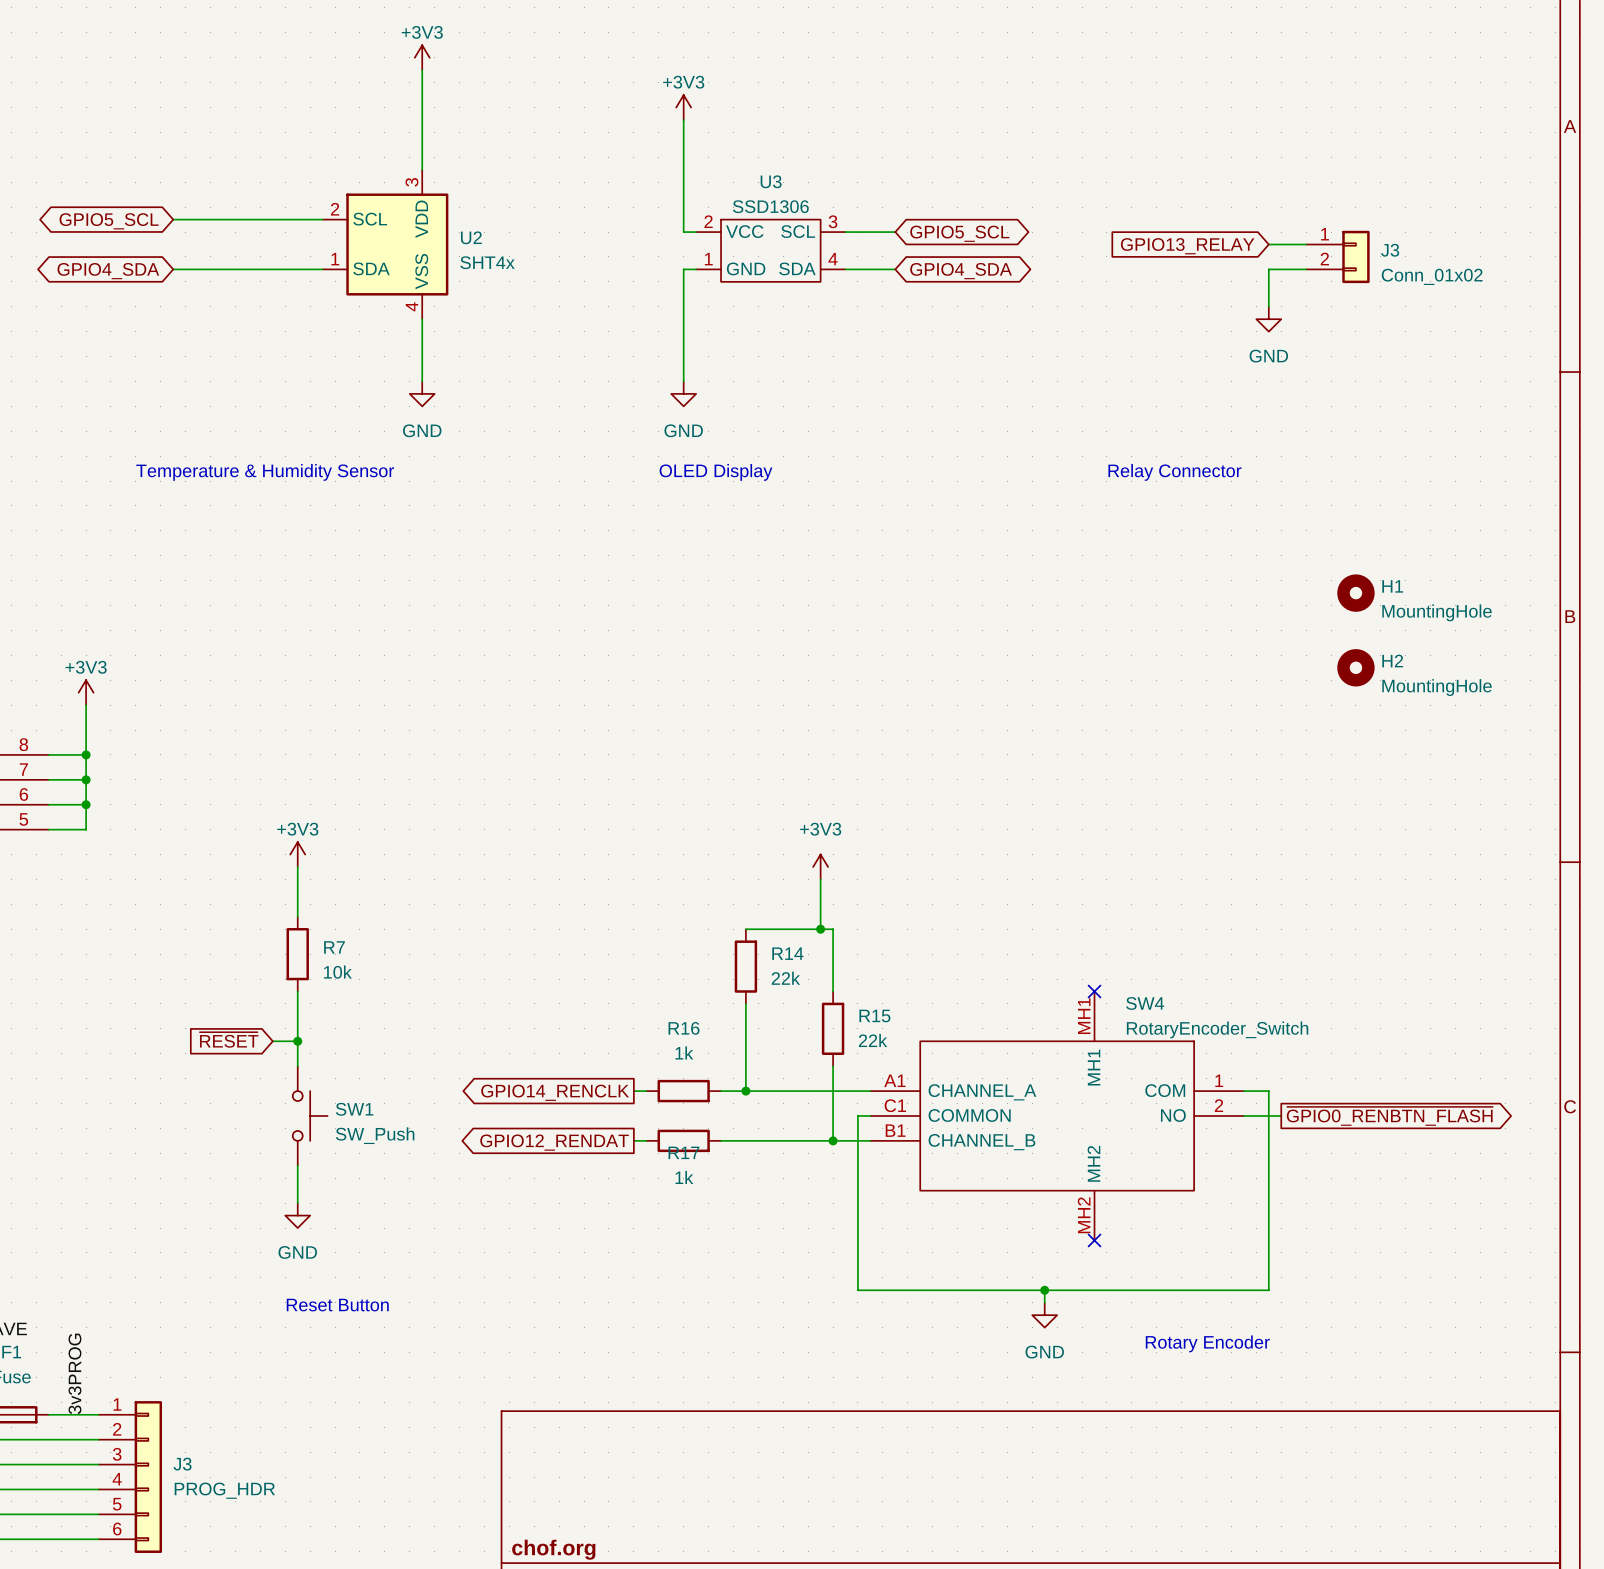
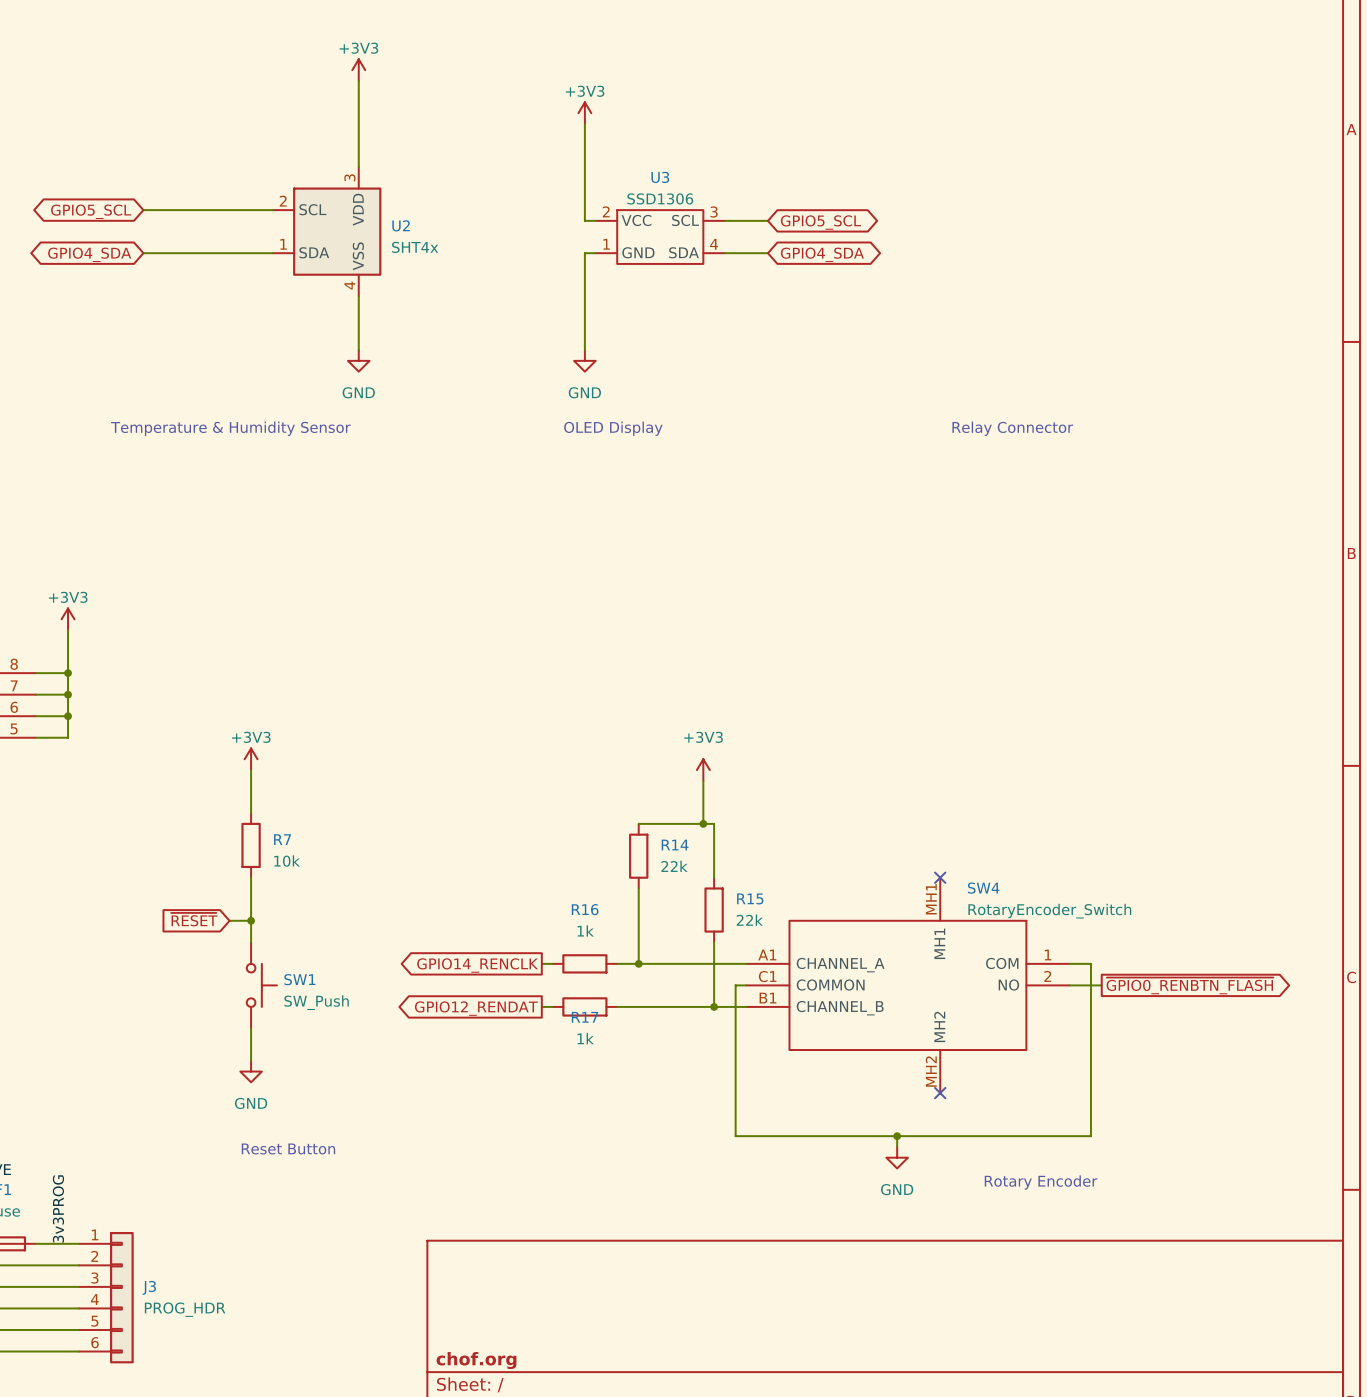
wire: (1268, 244) (1306, 244) -> none
global label: GPIO13_RELAY (1187, 246) -> none
J3: Conn_01x02 (1337, 256) -> none
wire: (1306, 269) (1268, 269) (1268, 306) -> none
power symbol: GND (1268, 319) -> none
H1: MountingHole (1355, 593) -> none
H2: MountingHole (1355, 667) -> none

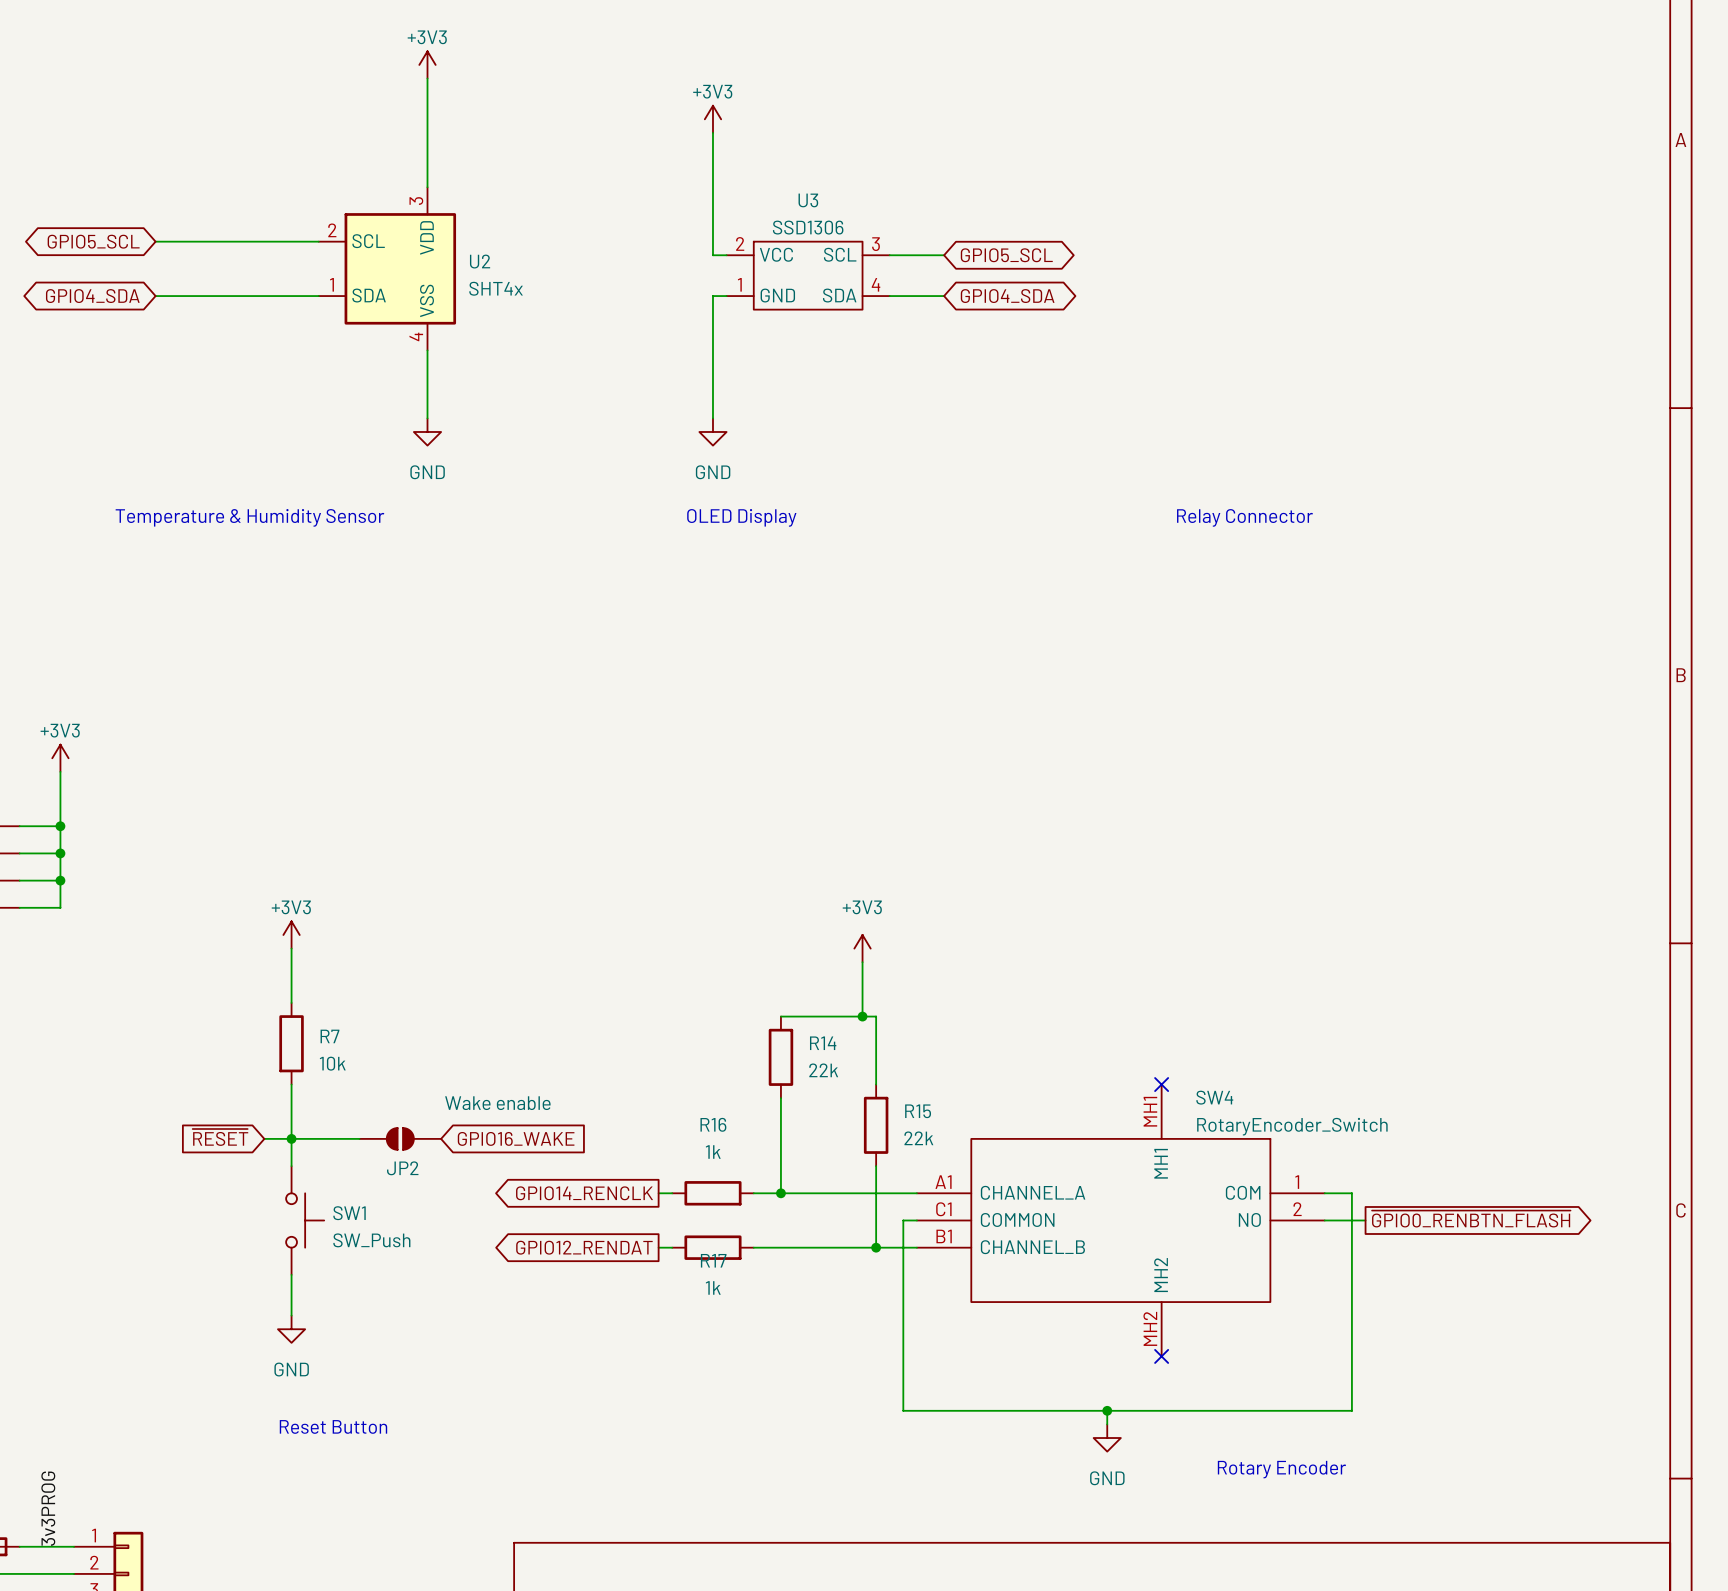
wire: none -> (291, 1138) (359, 1138)
JP2: none -> Wake enable (400, 1138)
global label: none -> GPIO16_WAKE (516, 1138)

